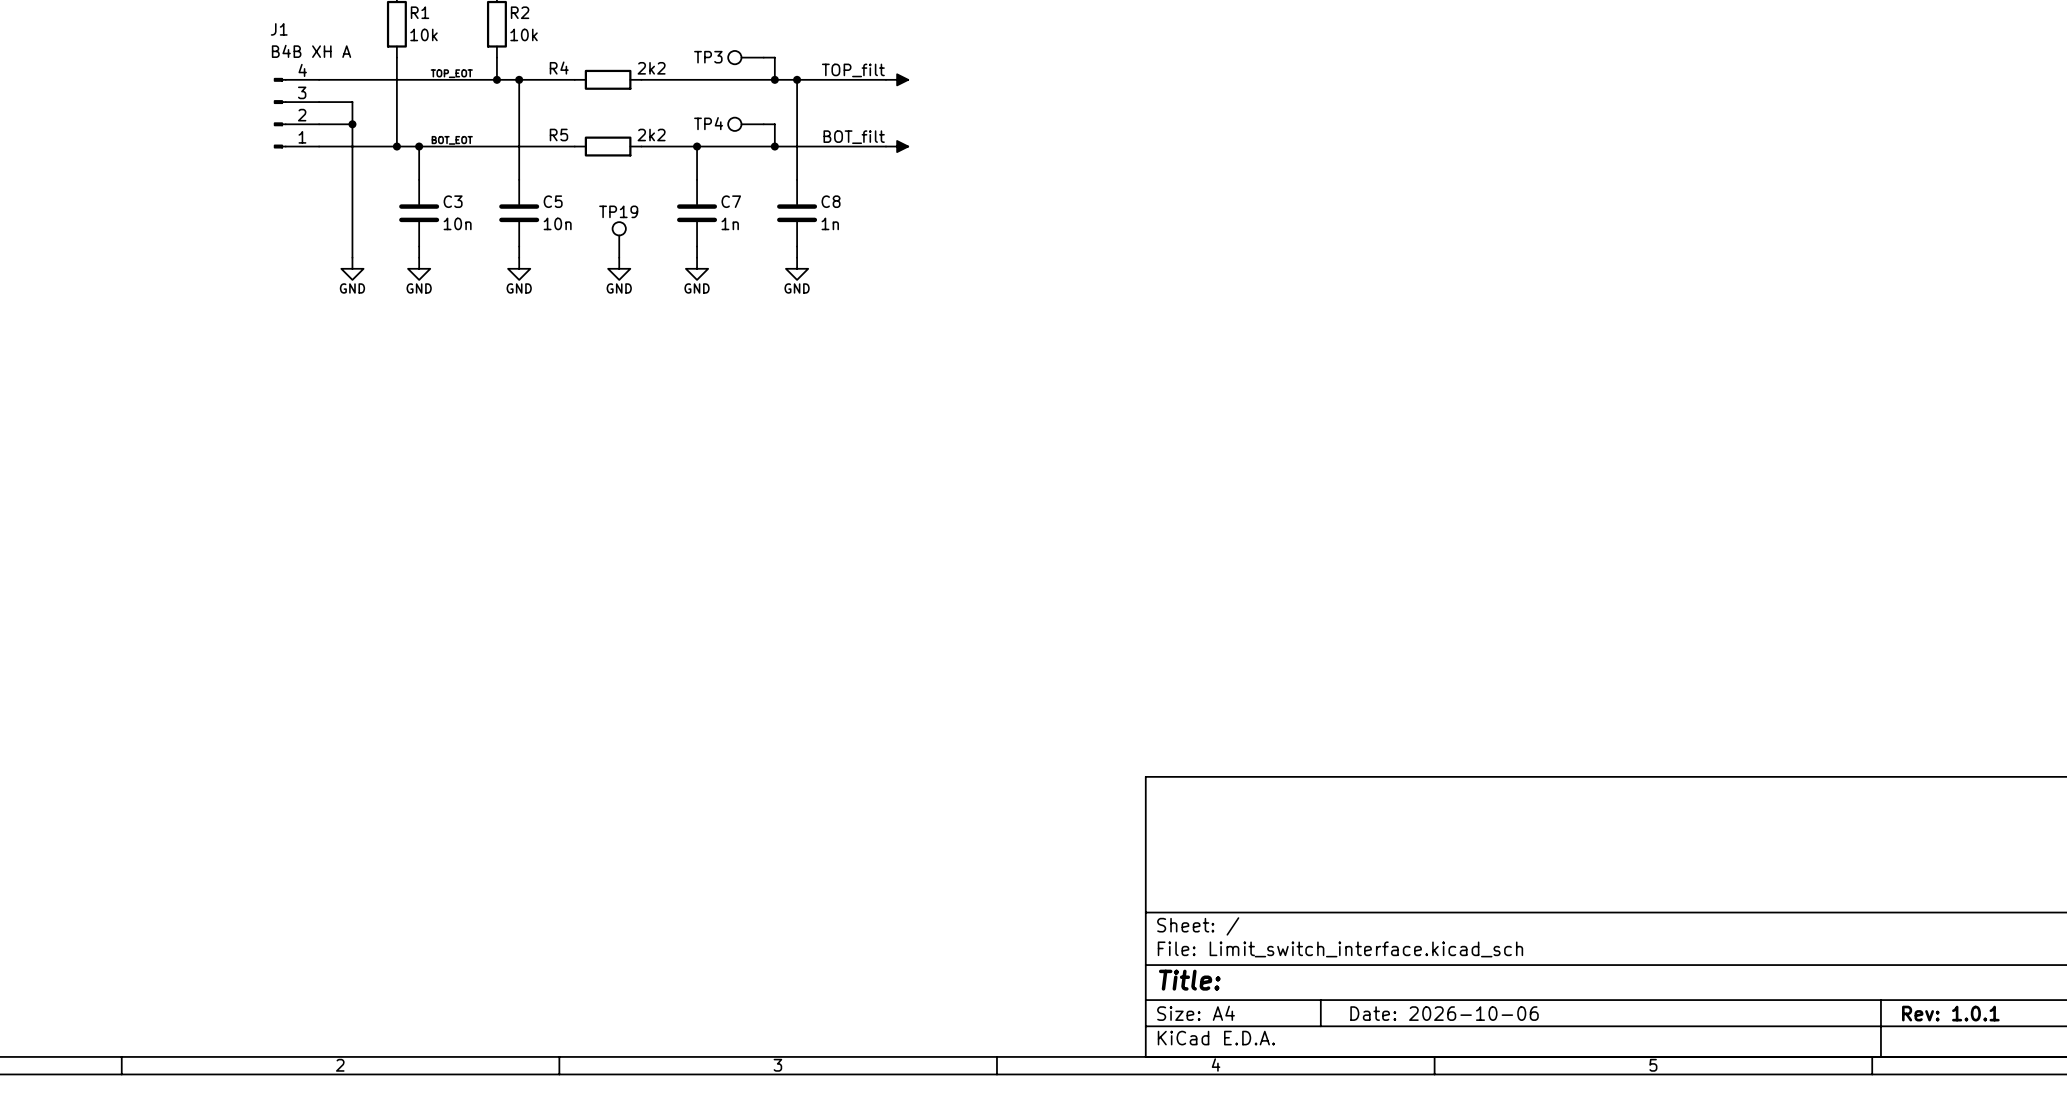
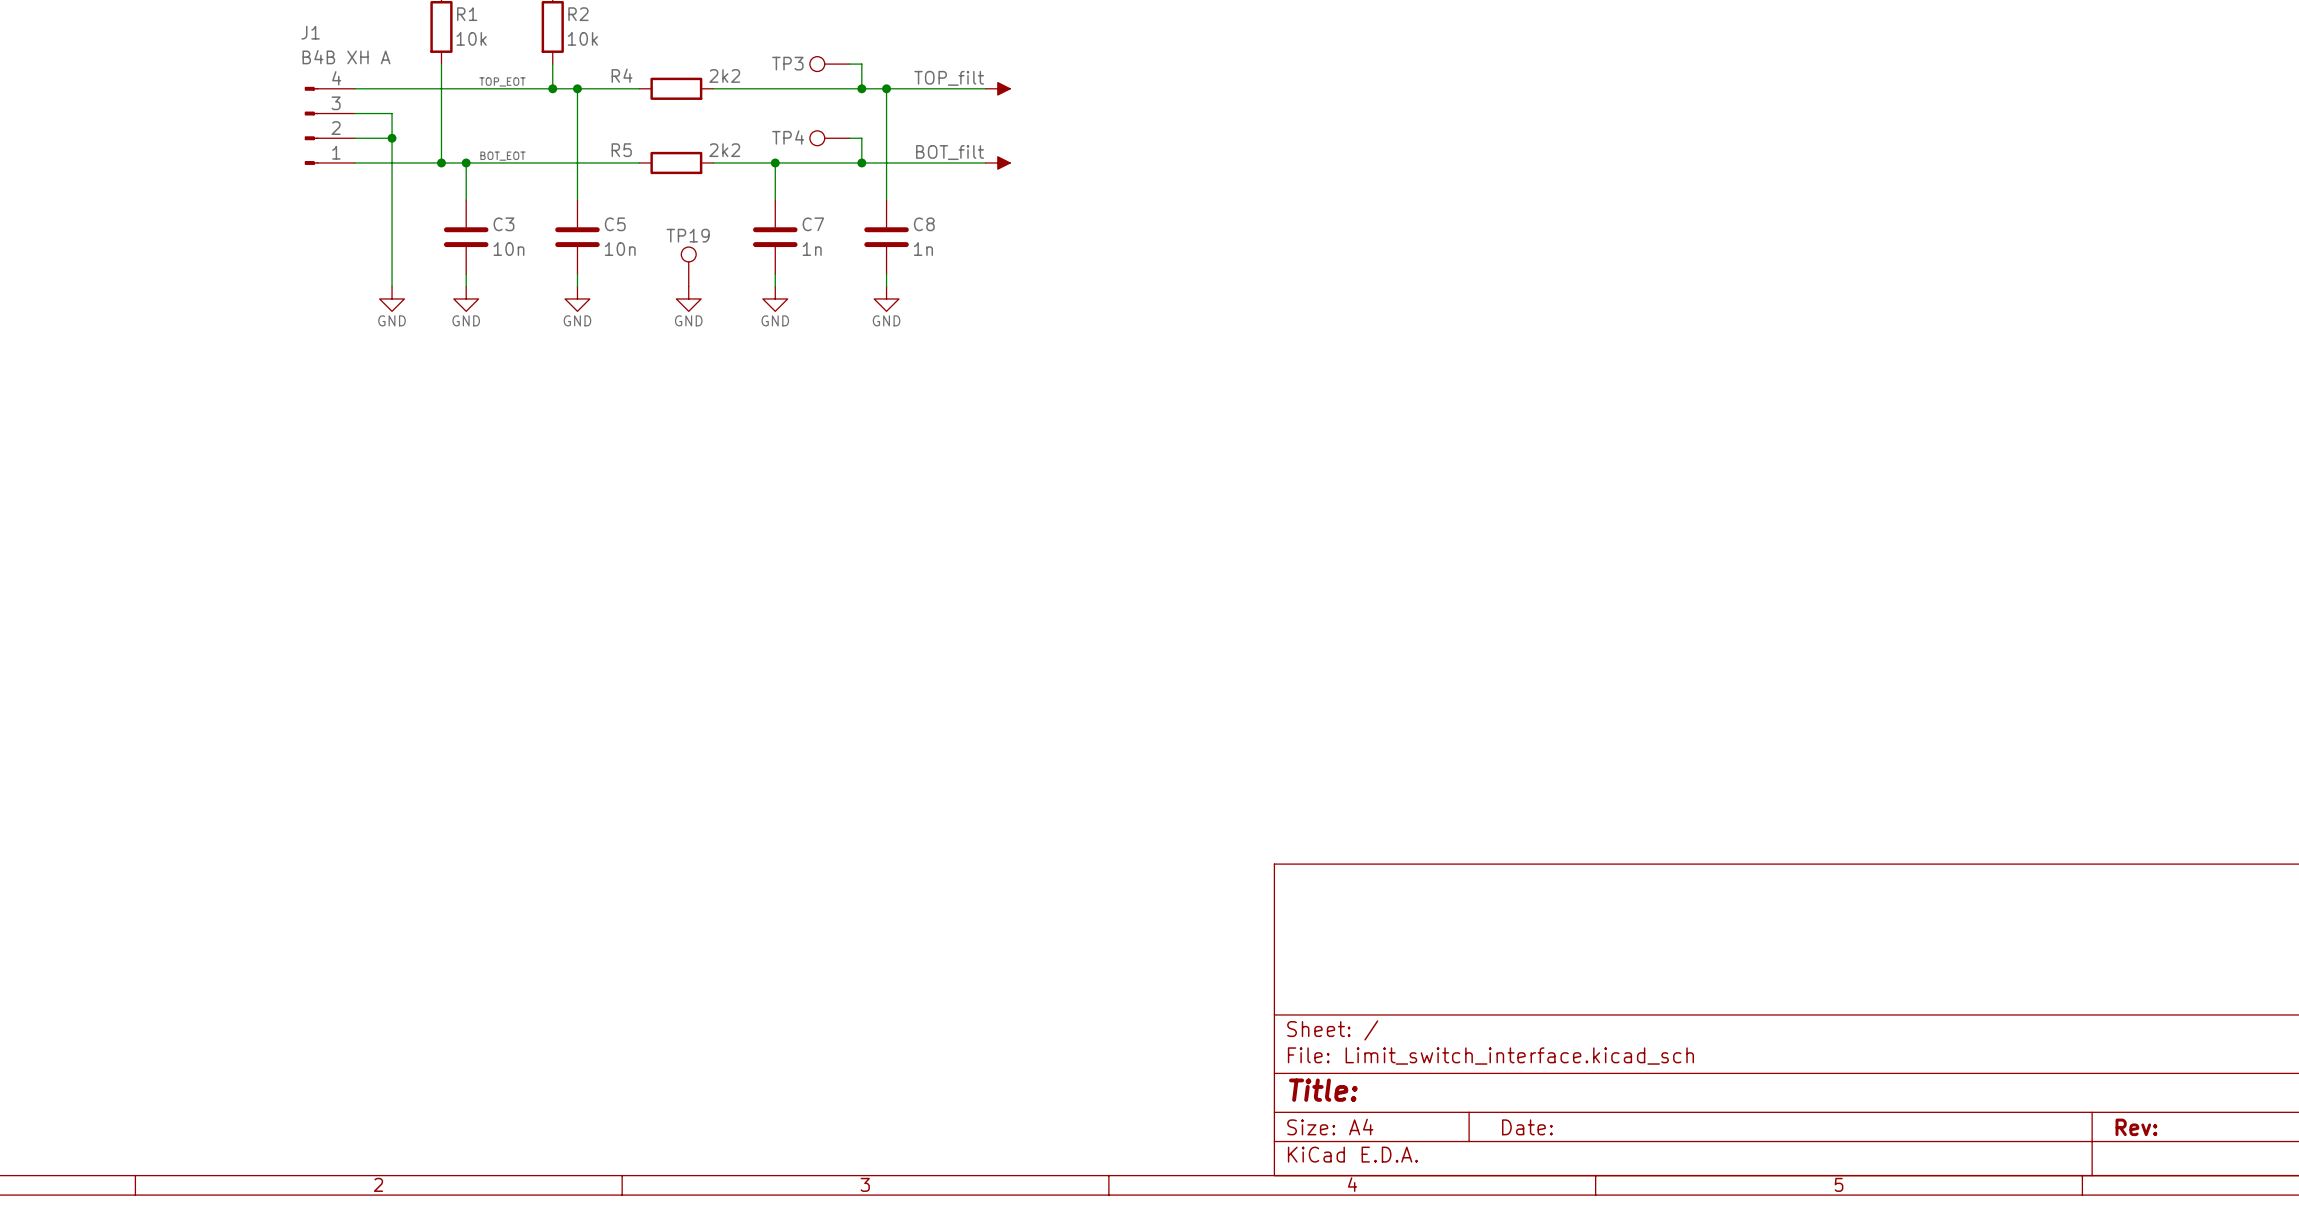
title block: Date: 2026-10-06 (1444, 1013) -> Date: (1527, 1127)
title block: Rev: 1.0.1 (1950, 1013) -> Rev: (2136, 1127)

